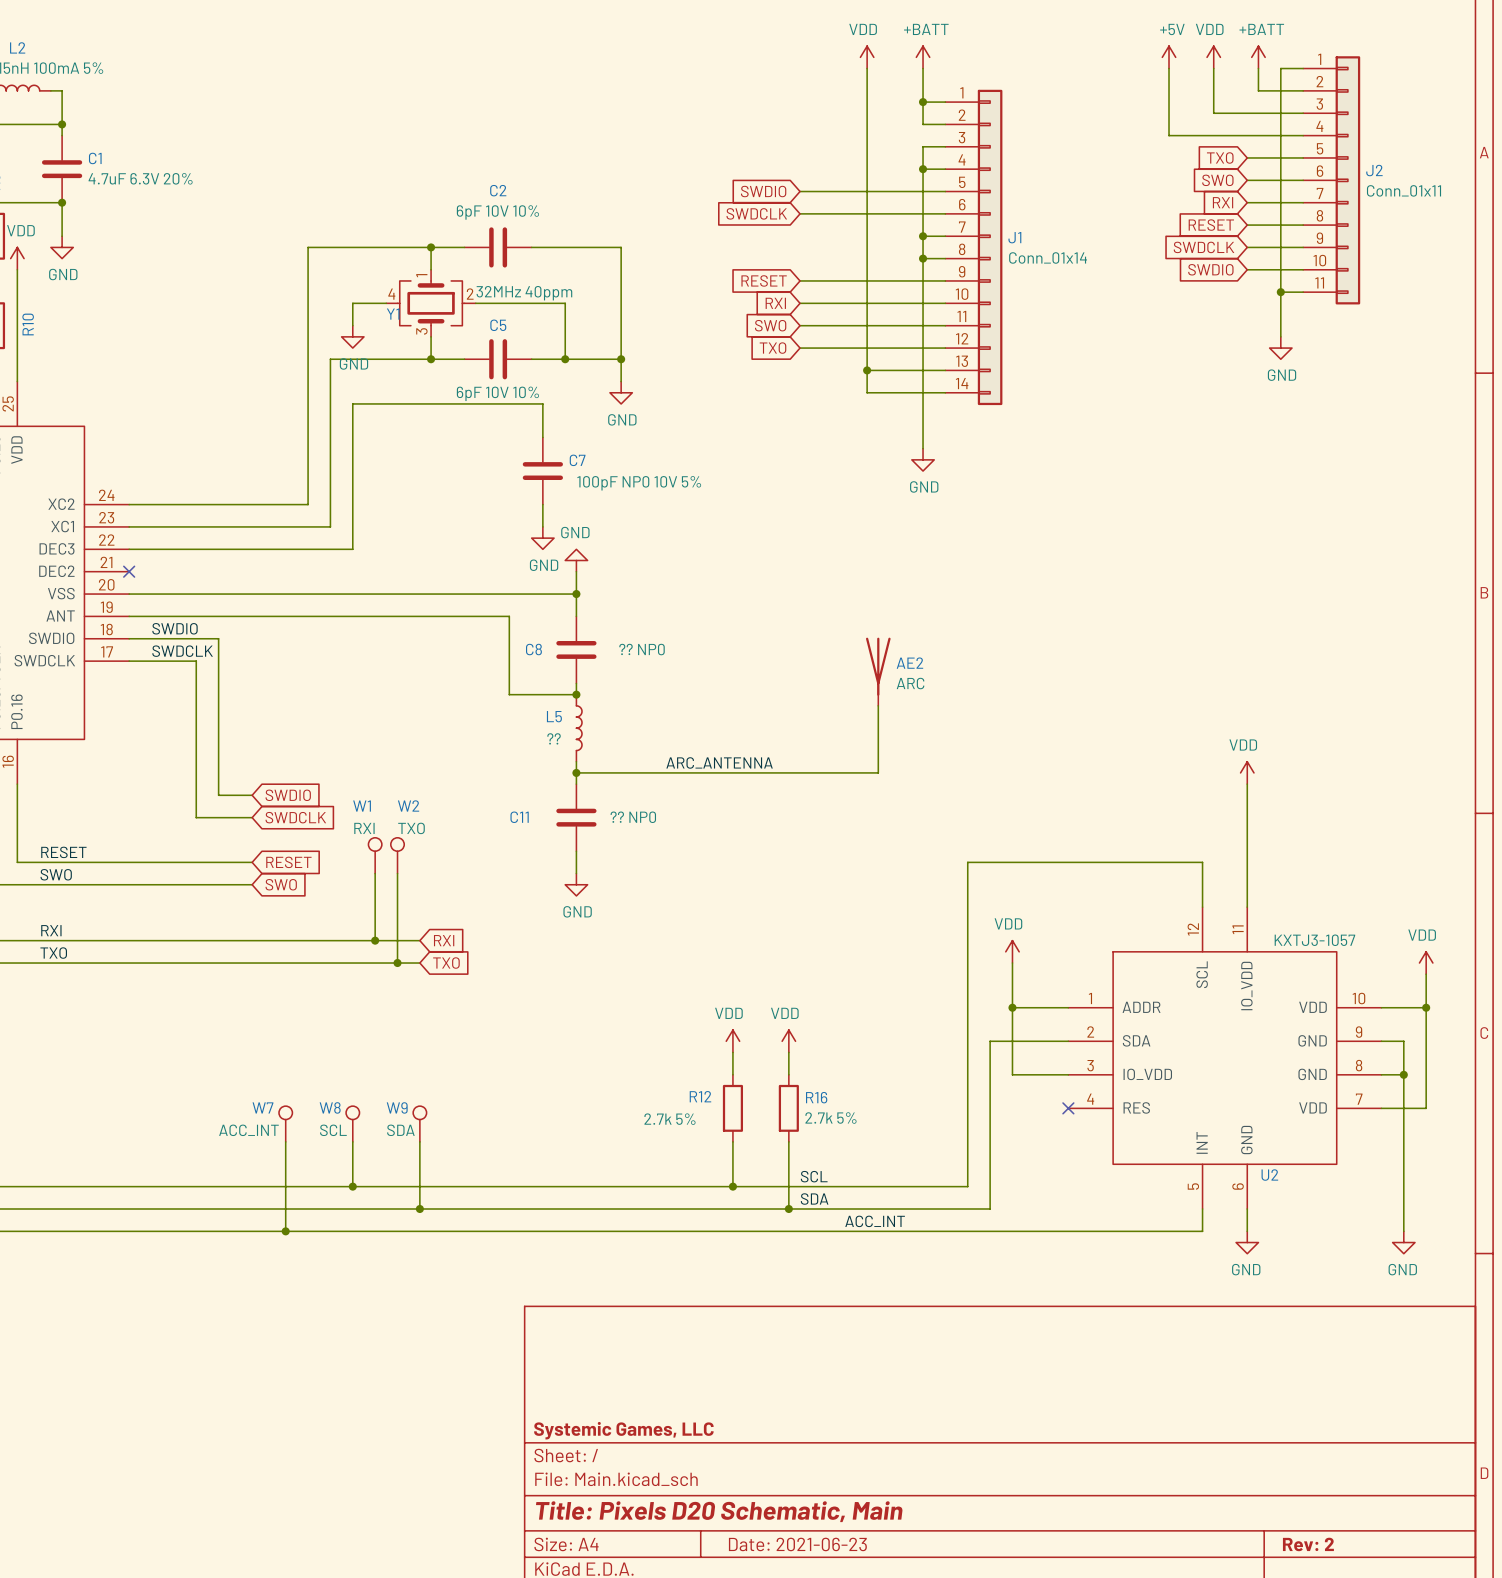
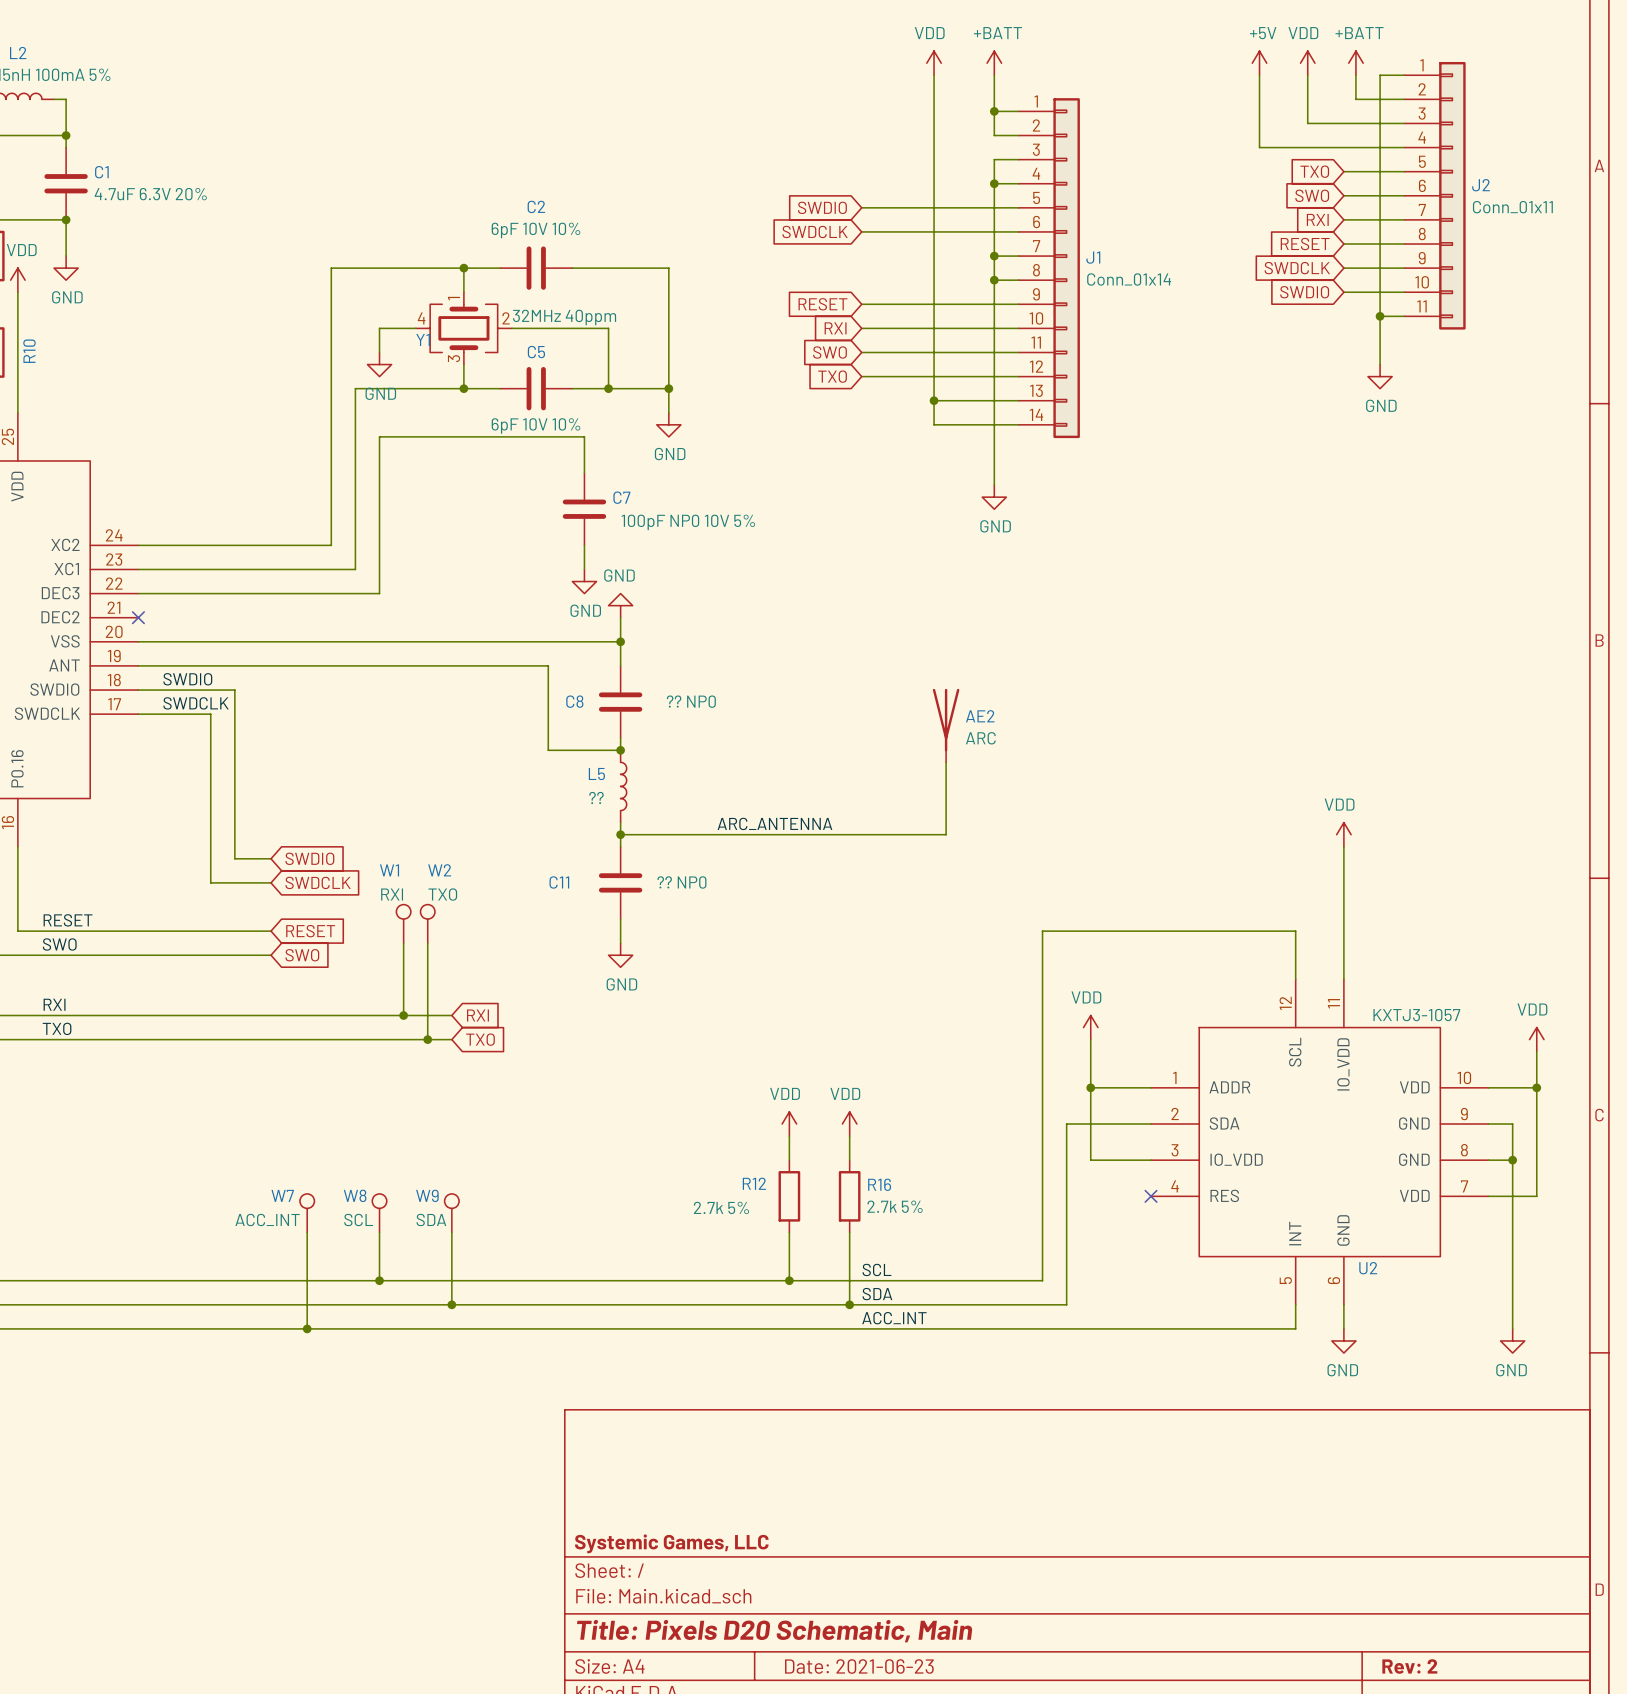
label position: ACC_INT (875, 1221) -> ACC_INT (894, 1318)

